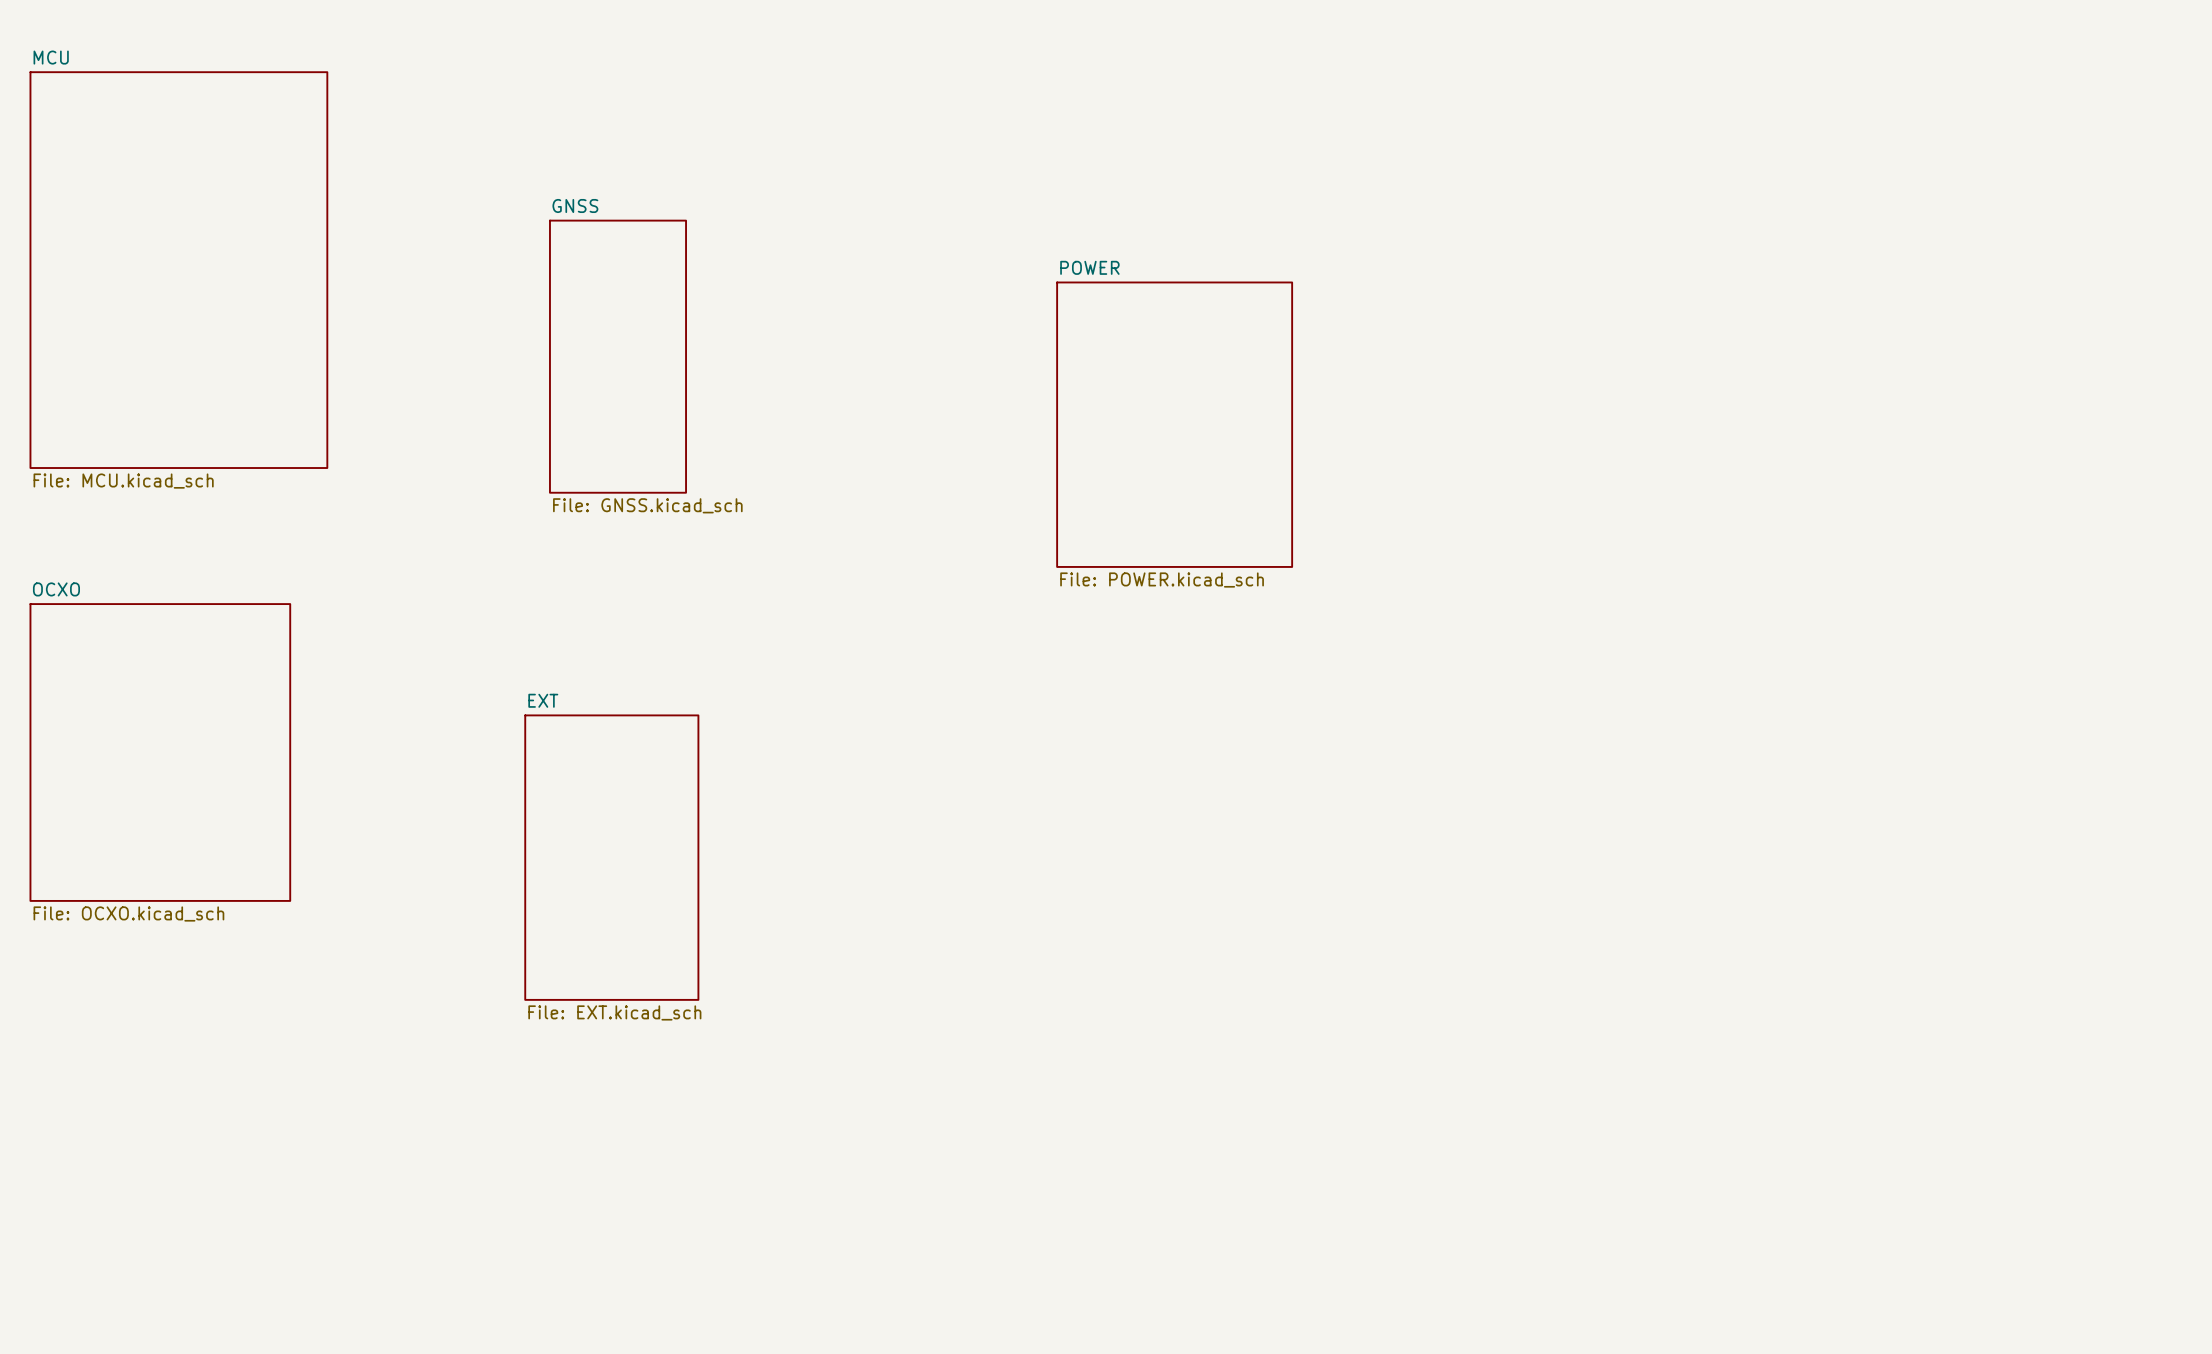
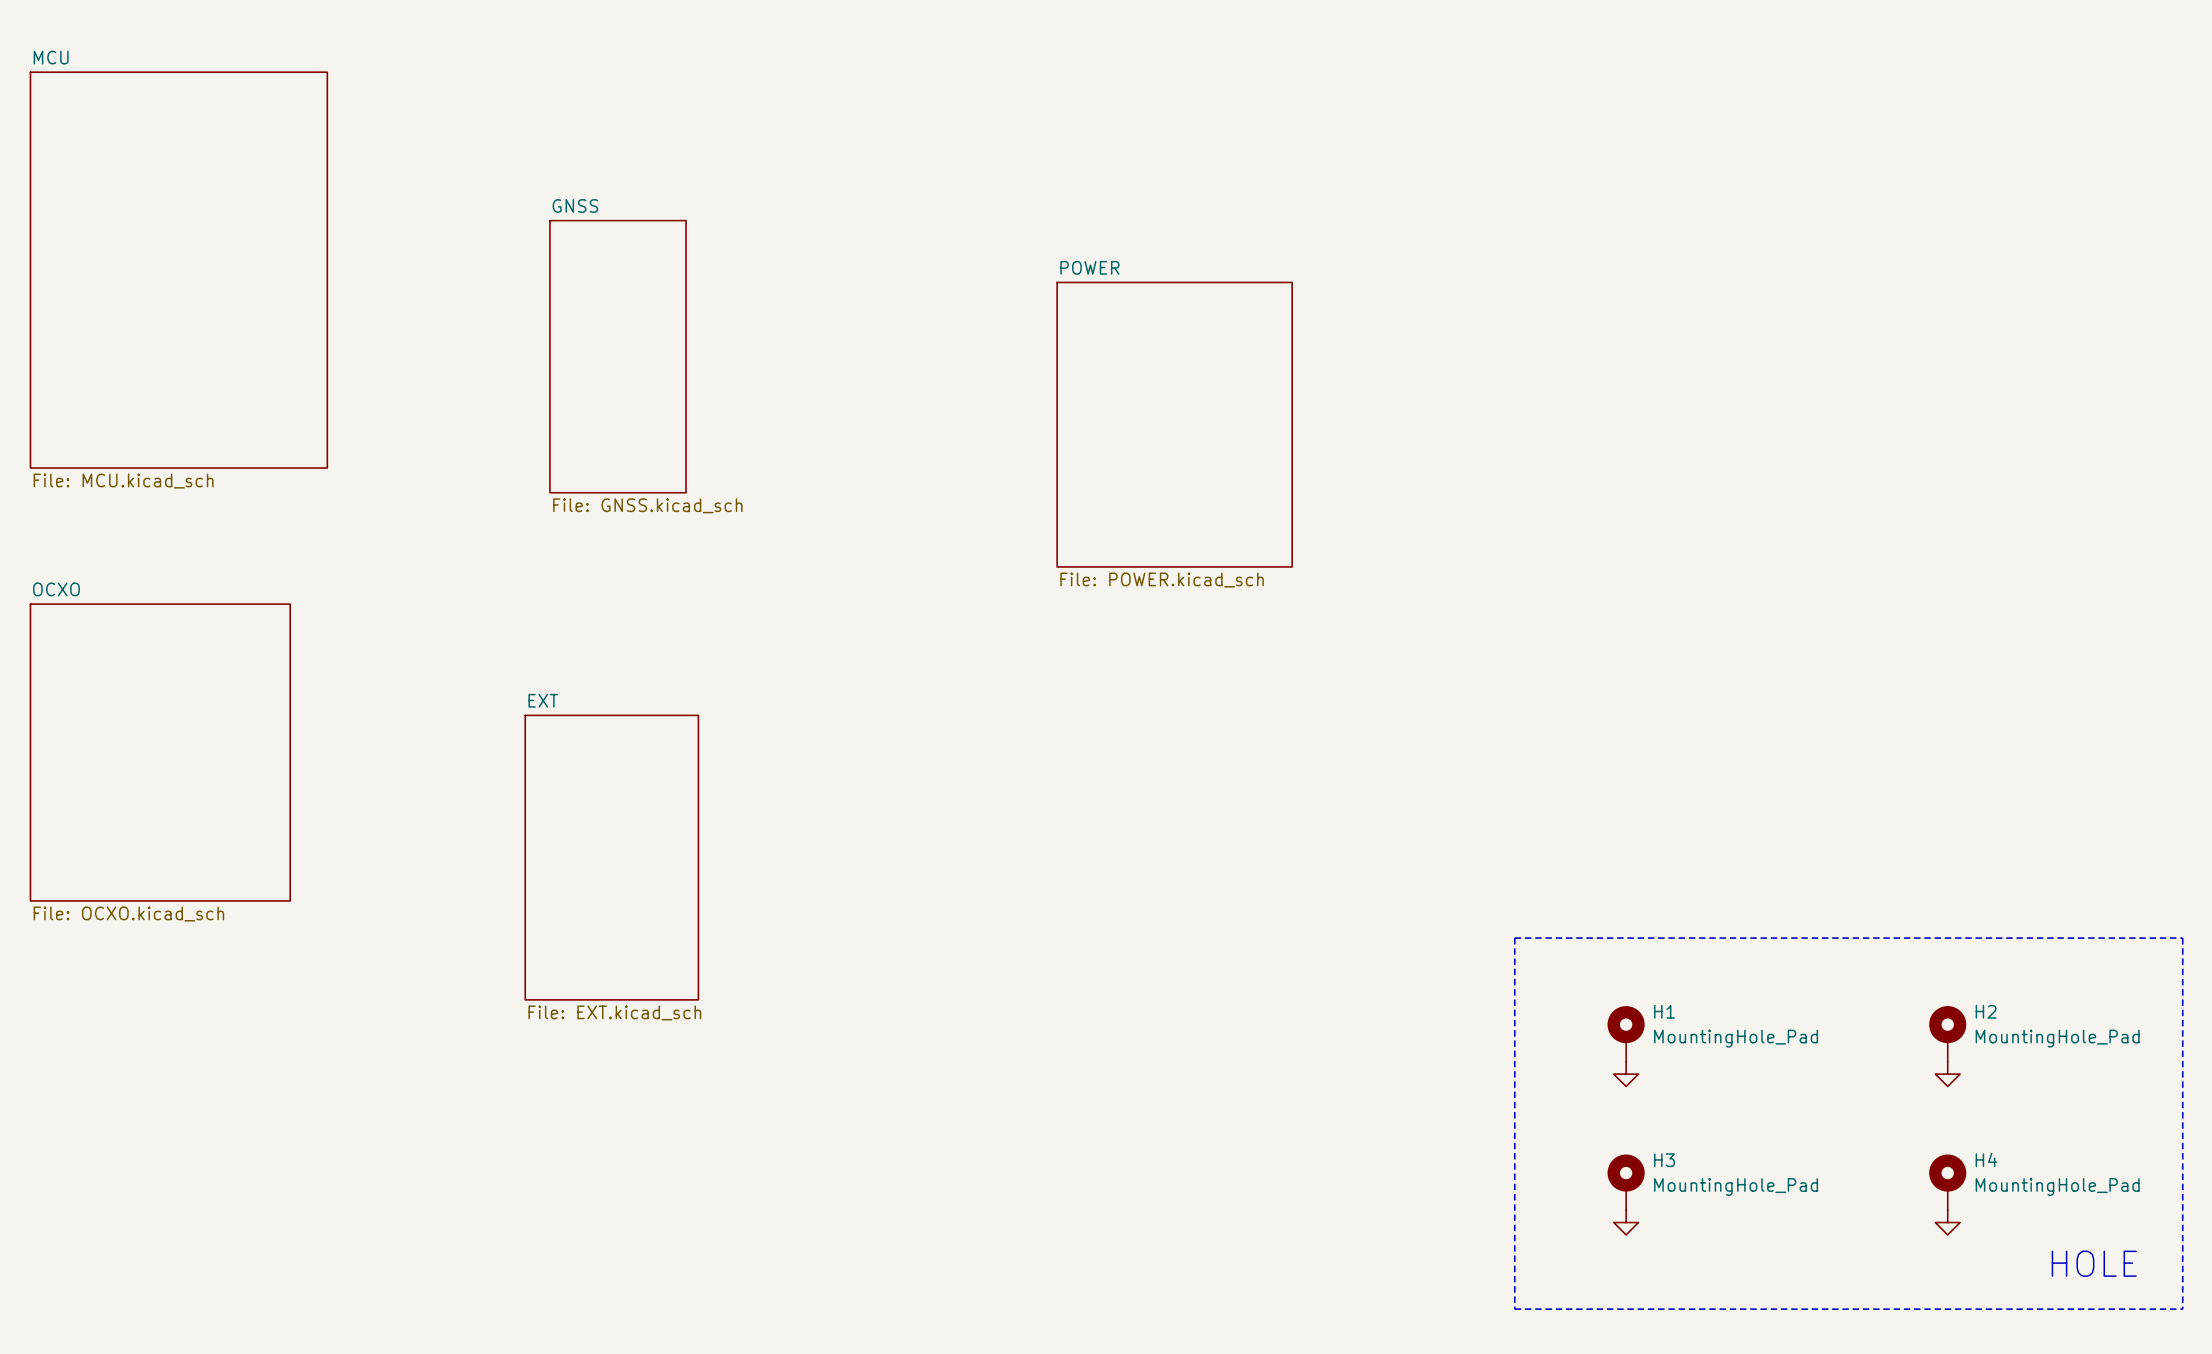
line: none -> (1514, 938) (1514, 1309) (2182, 1309) (2182, 938) (1514, 938)
H1: none -> MountingHole_Pad (1626, 1033)
H2: none -> MountingHole_Pad (1947, 1033)
power symbol: none -> (1626, 1074)
power symbol: none -> (1947, 1074)
H3: none -> MountingHole_Pad (1626, 1182)
H4: none -> MountingHole_Pad (1947, 1182)
power symbol: none -> (1626, 1222)
power symbol: none -> (1947, 1222)
text: none -> HOLE (2094, 1263)

